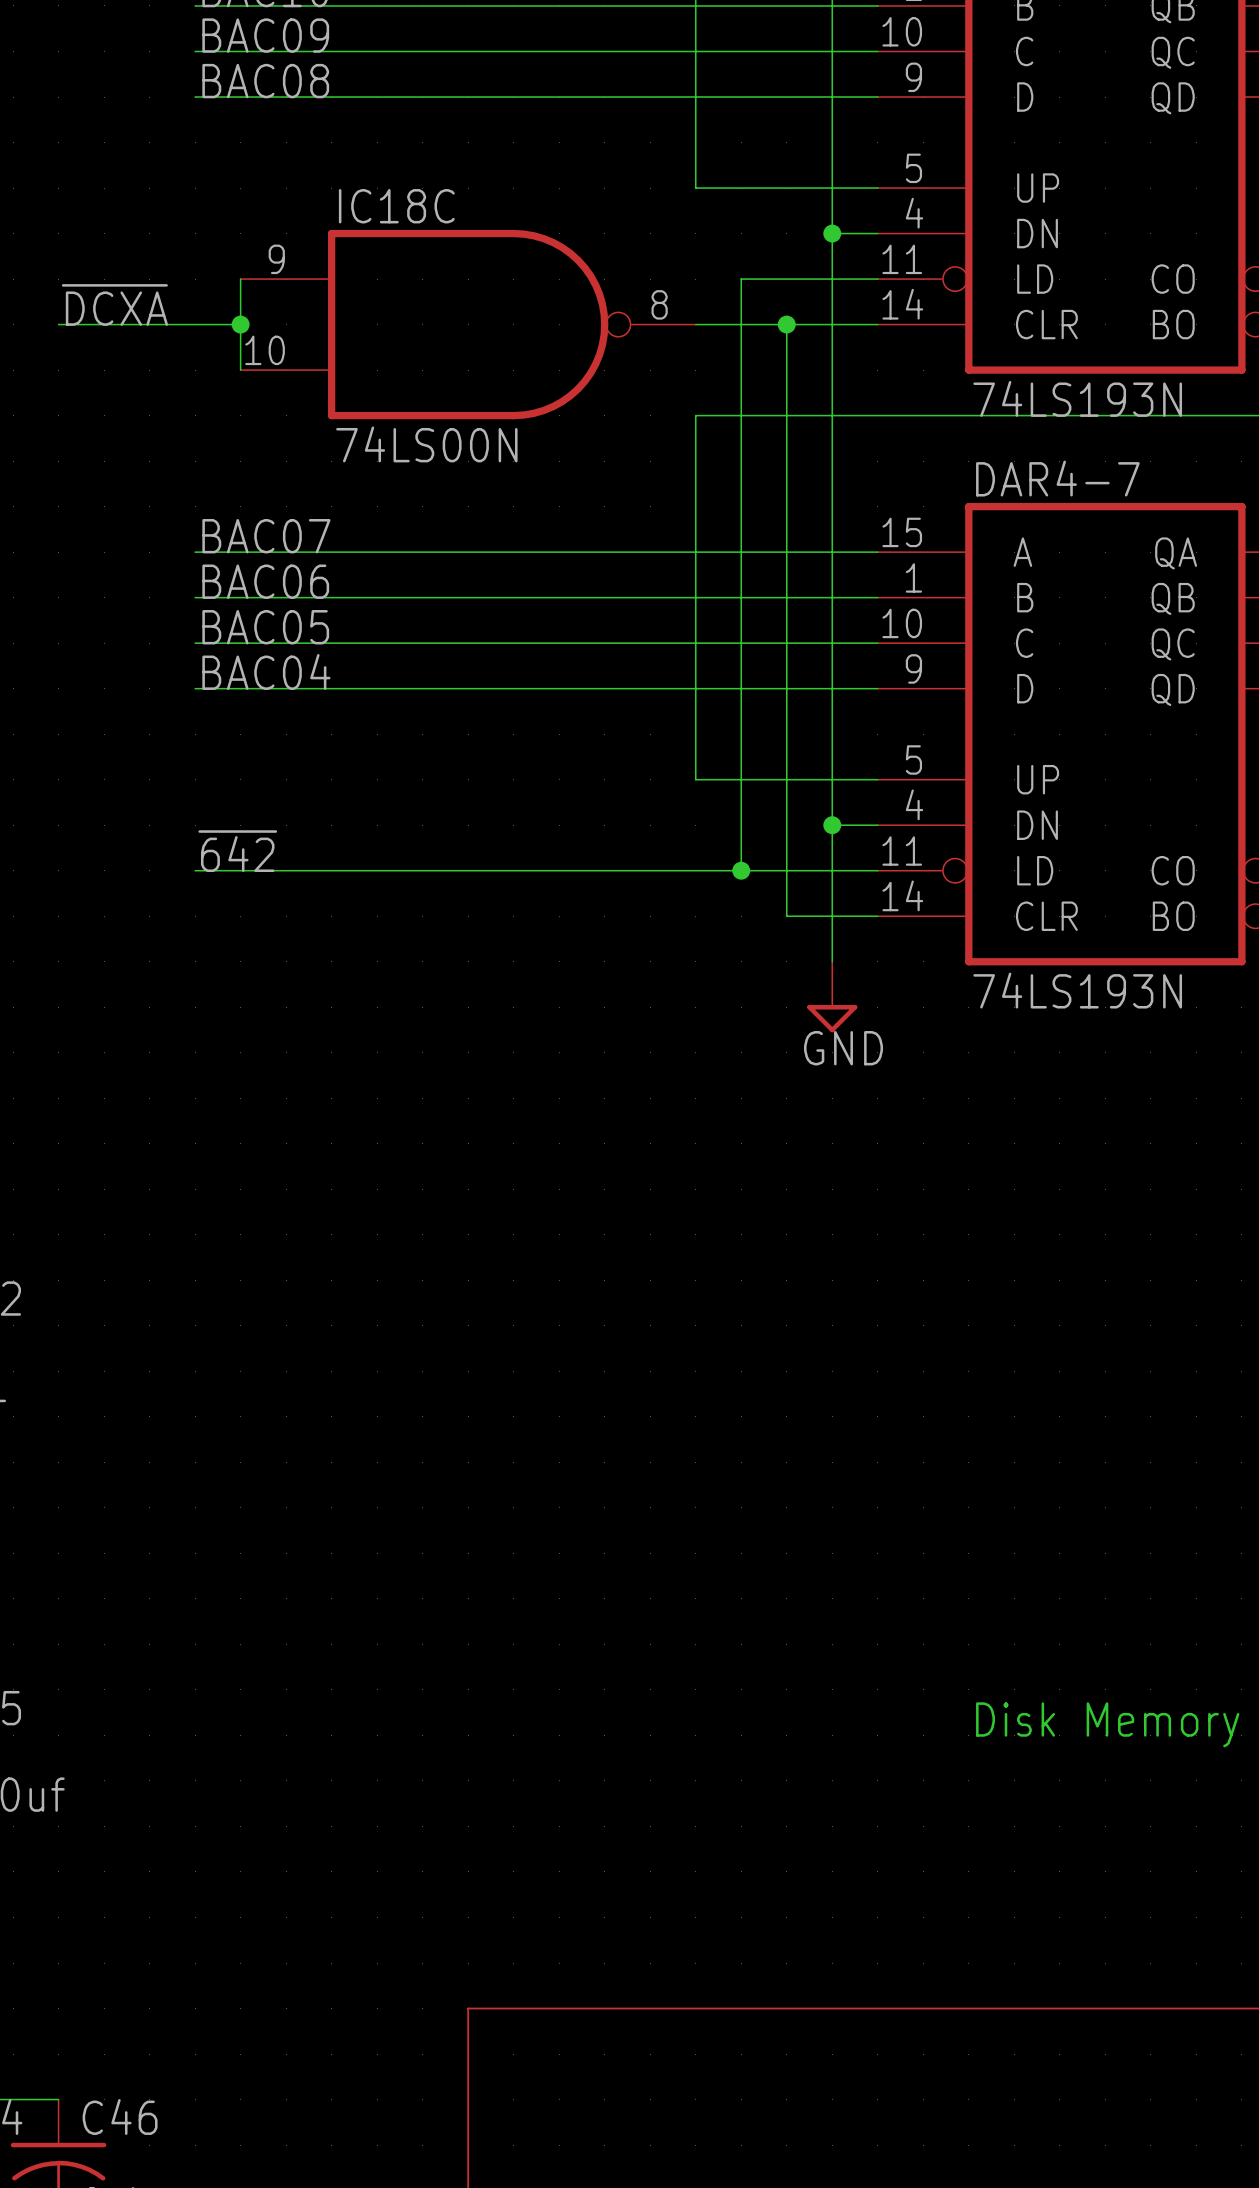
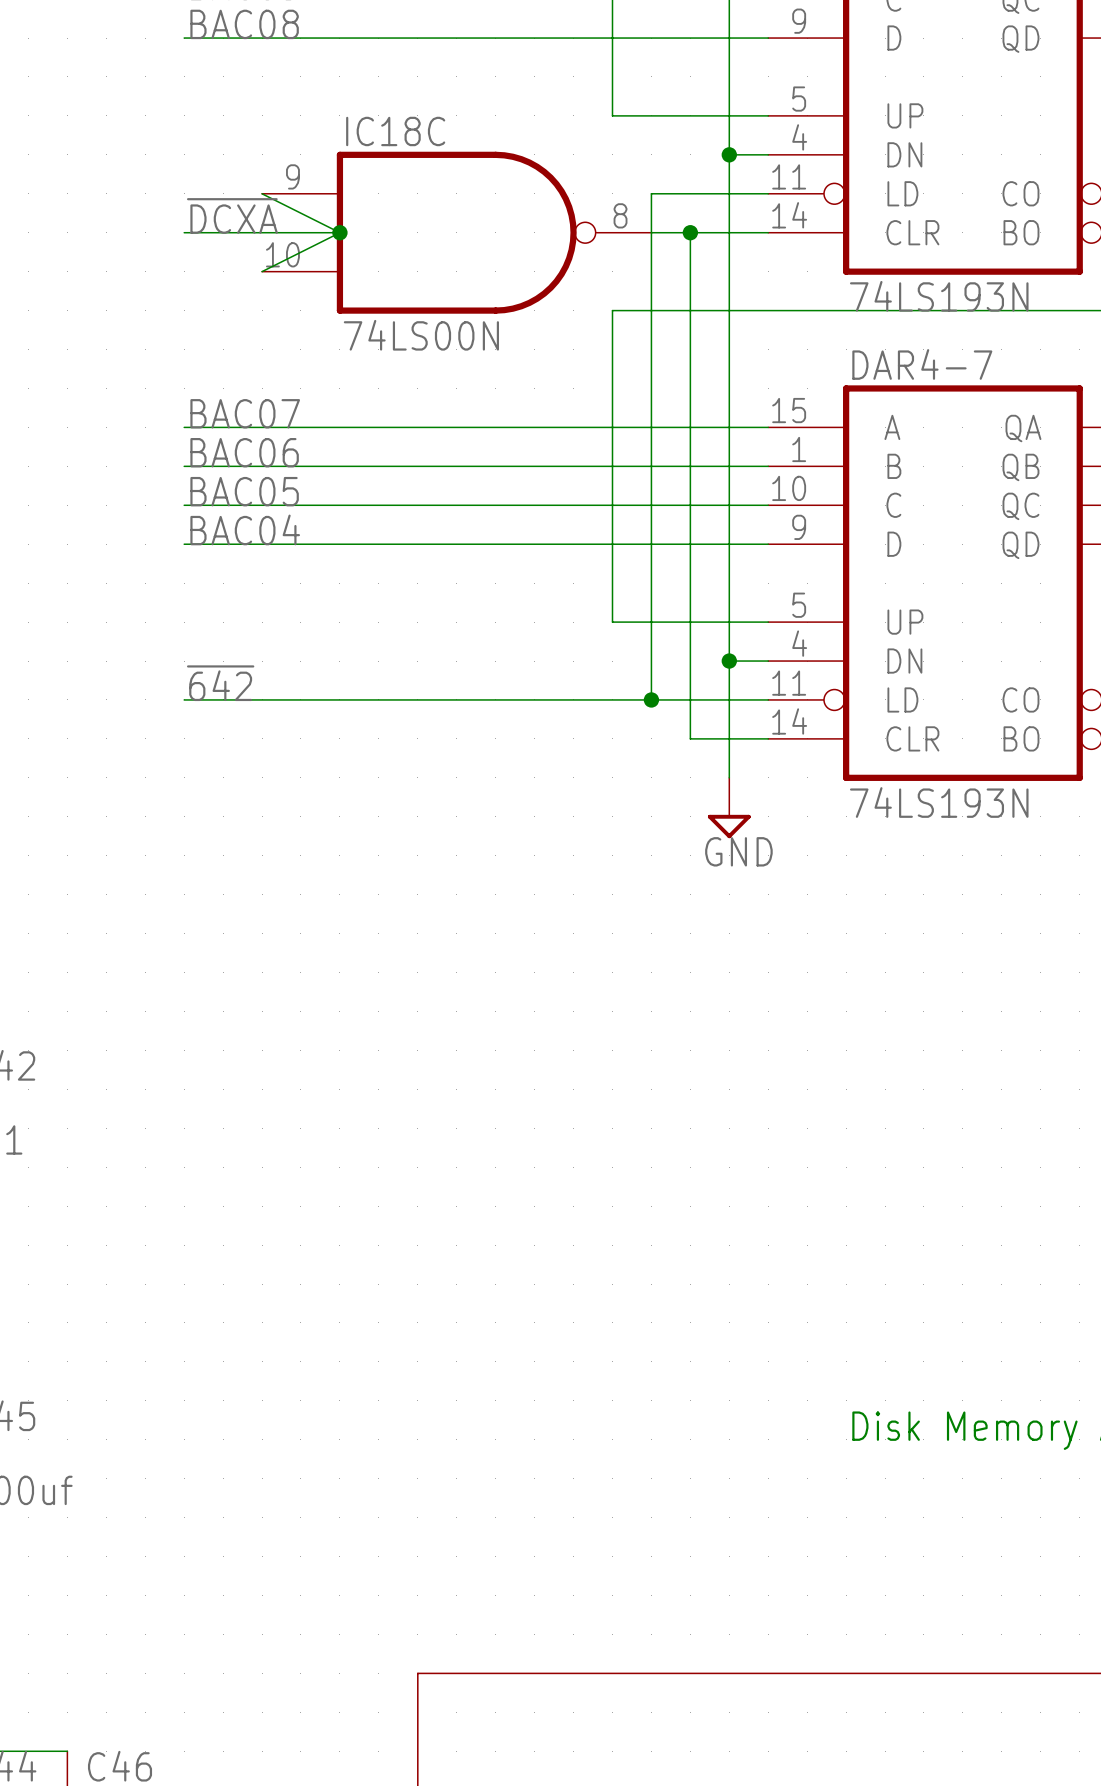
wire: (240, 279) (240, 370) -> none
wire: none -> (262, 193) (339, 232)
label position: ~{DCXA} (114, 304) -> ~{DCXA} (232, 215)
wire: (58, 324) (195, 324) -> (223, 232) (339, 232)
junction: (240, 324) -> none
wire: none -> (339, 232) (262, 271)
junction: none -> (339, 232)
IC18C position: (468, 324) -> (456, 232)

